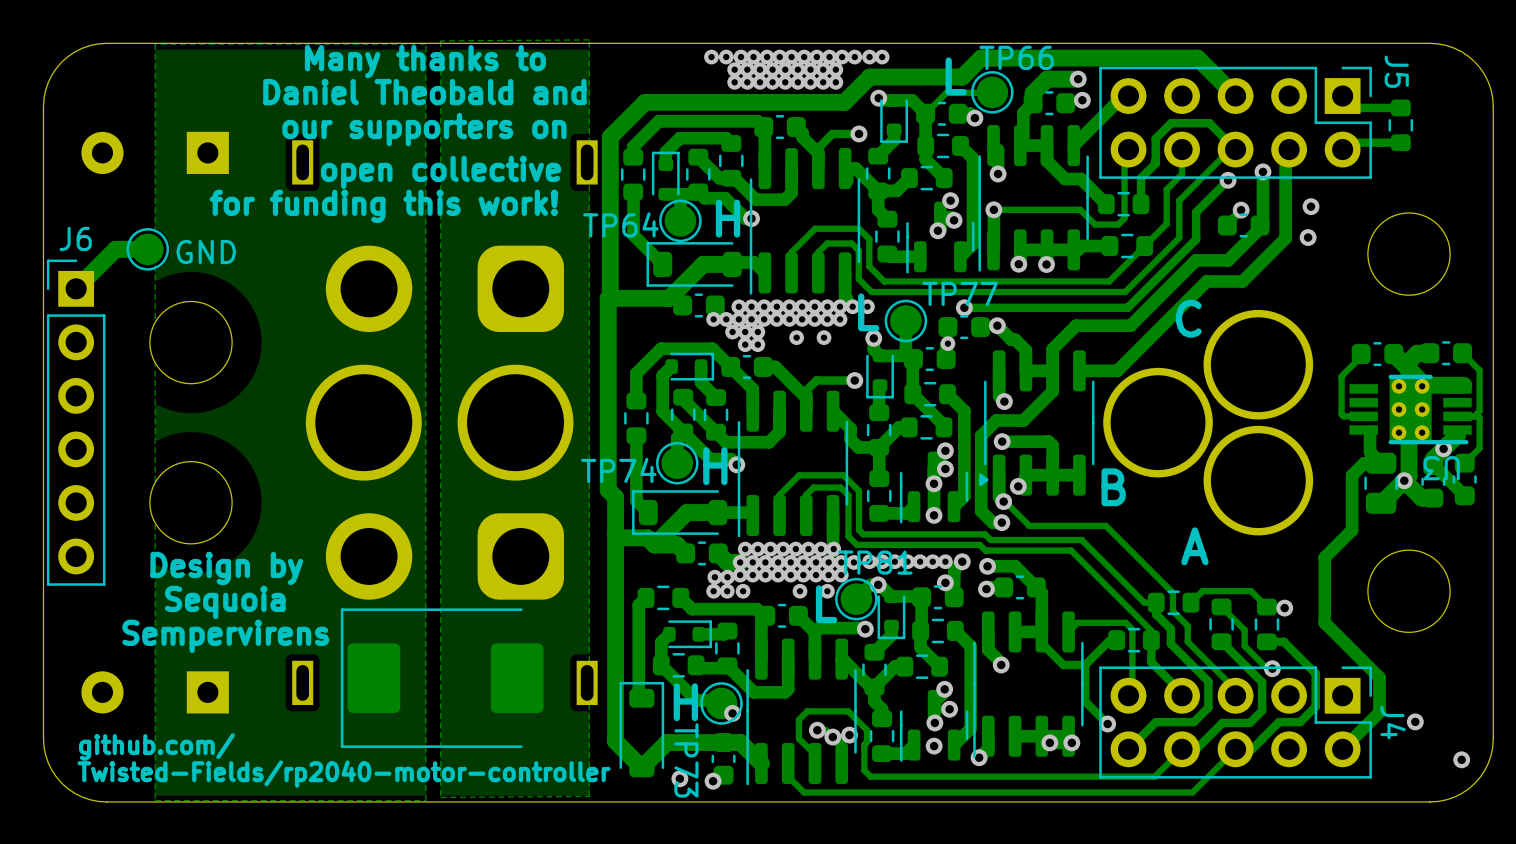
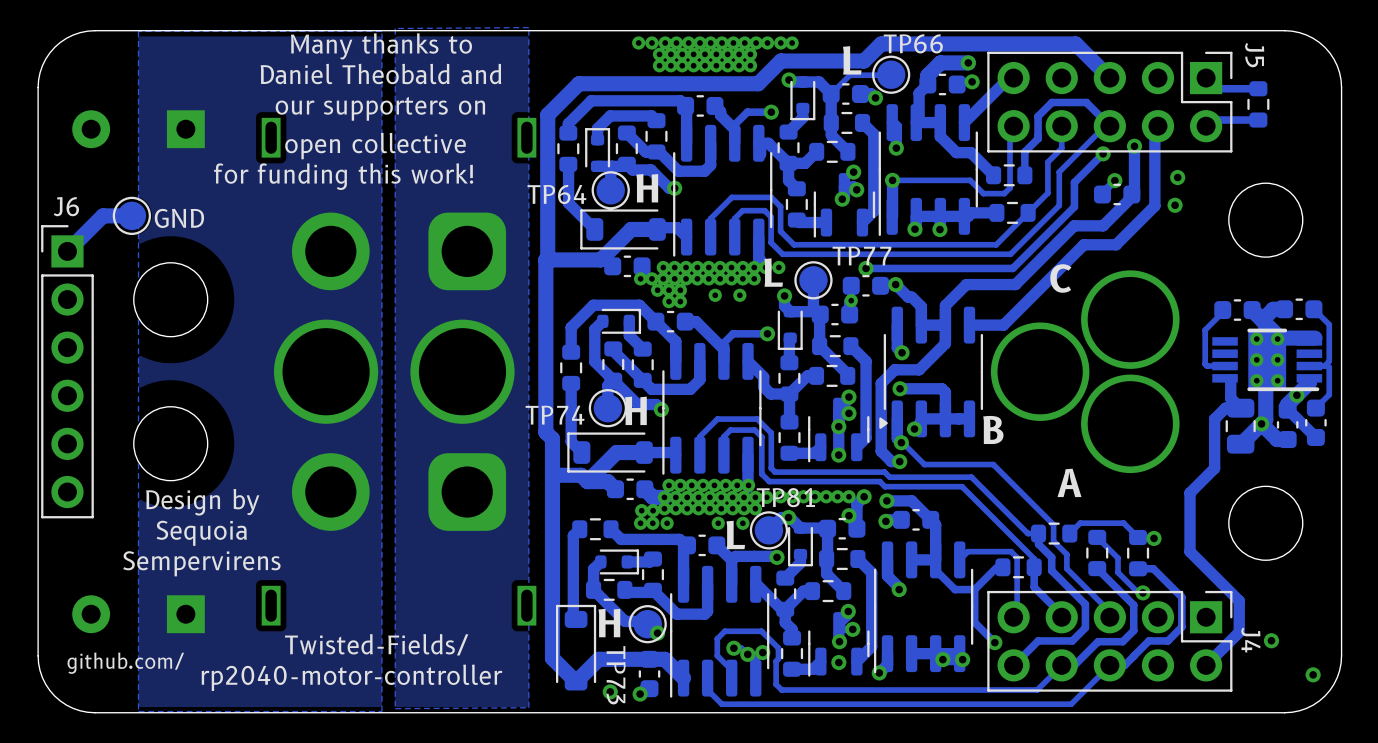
U3 name: U3 (1441, 468) -> none
part: (442, 678) -> none
text: none -> Twisted-Fields/ (376, 644)
text: Twisted-Fields/rp2040-motor-controller (343, 774) -> rp2040-motor-controller (351, 677)

